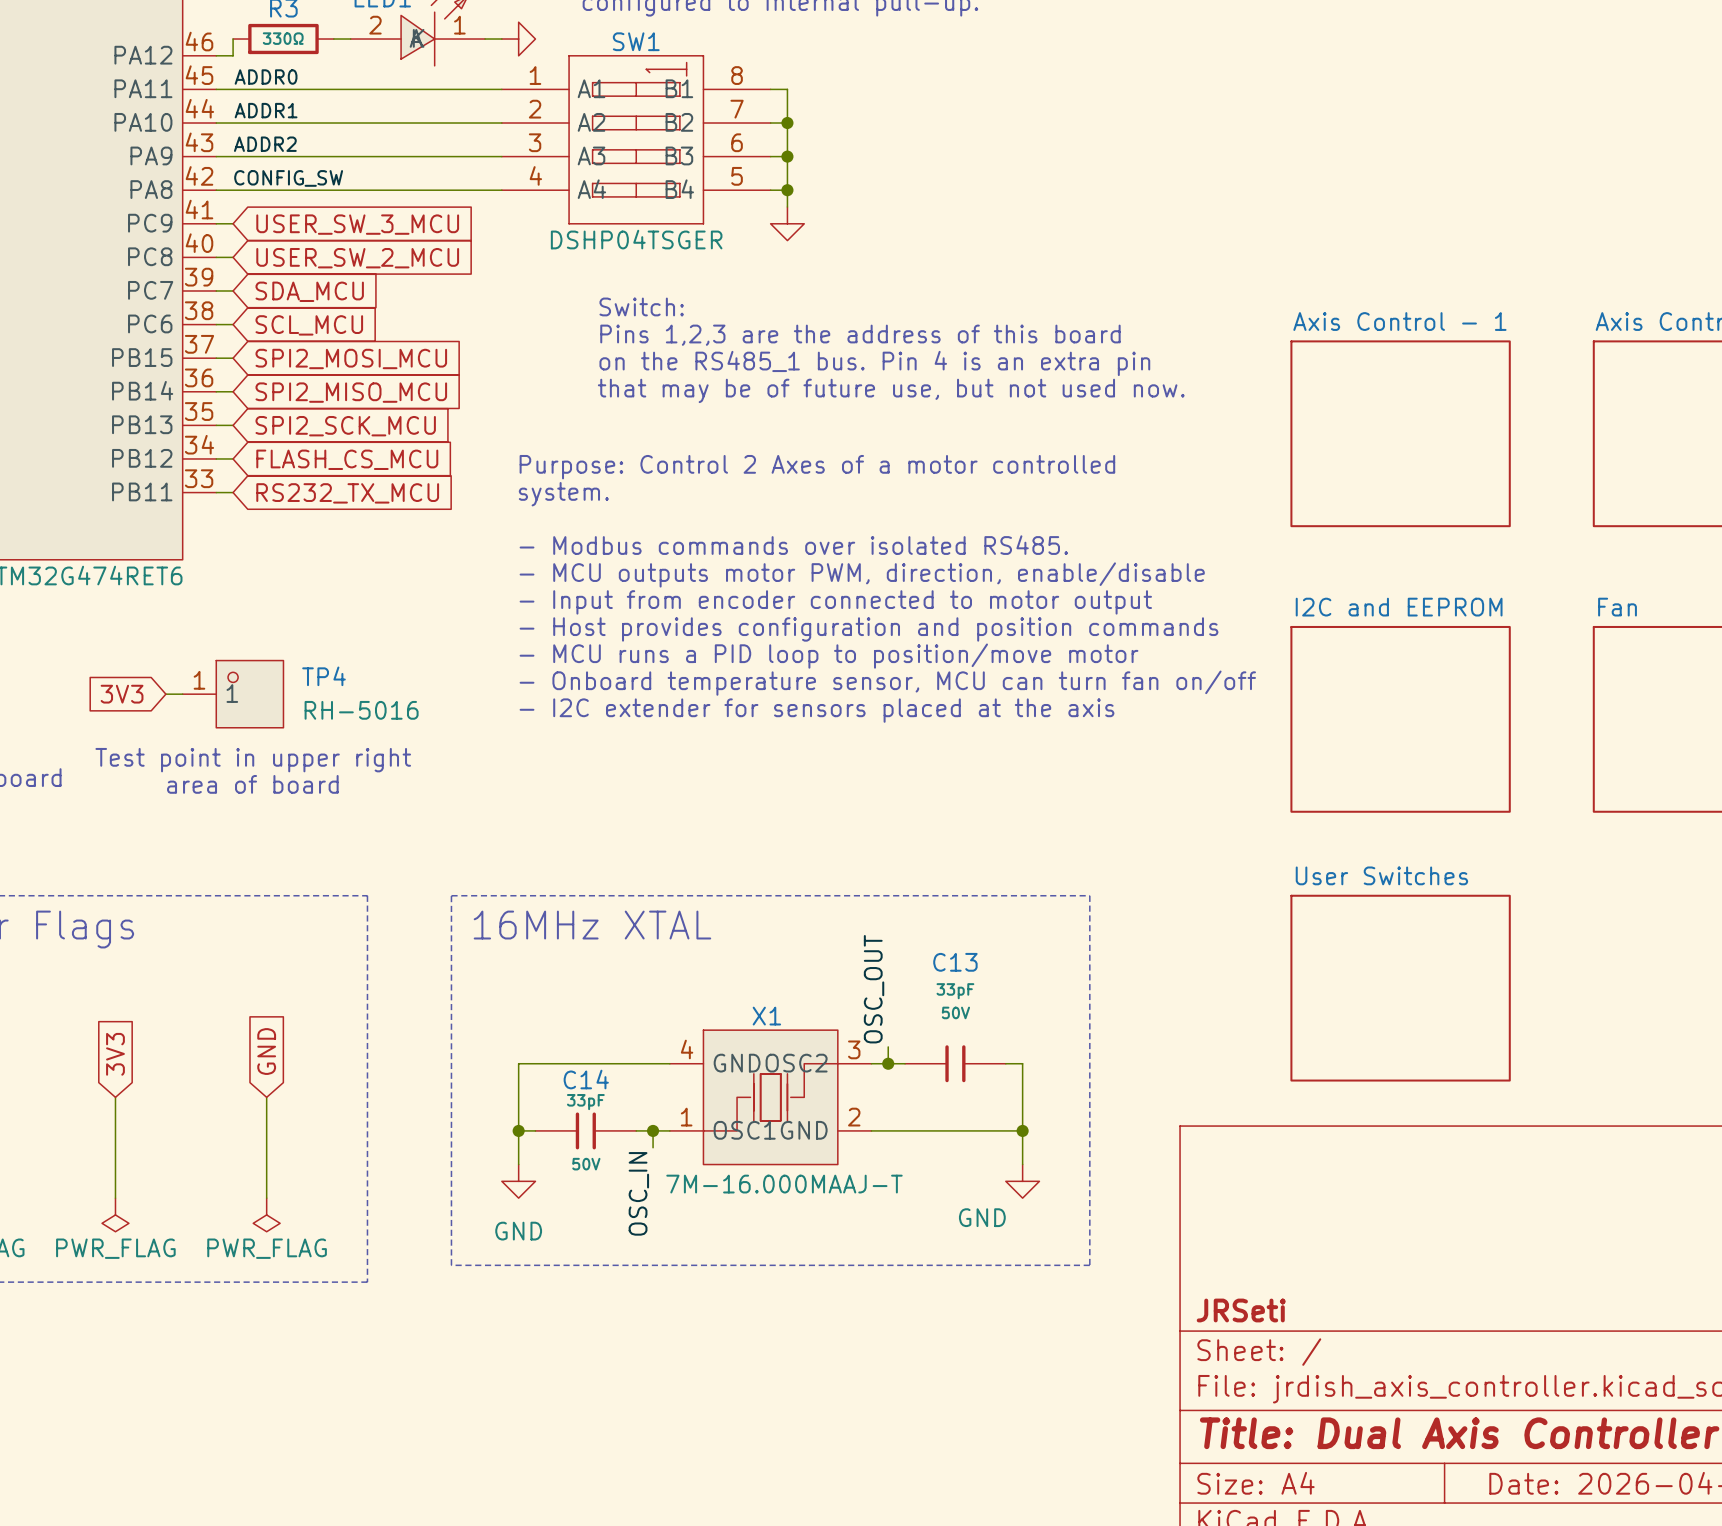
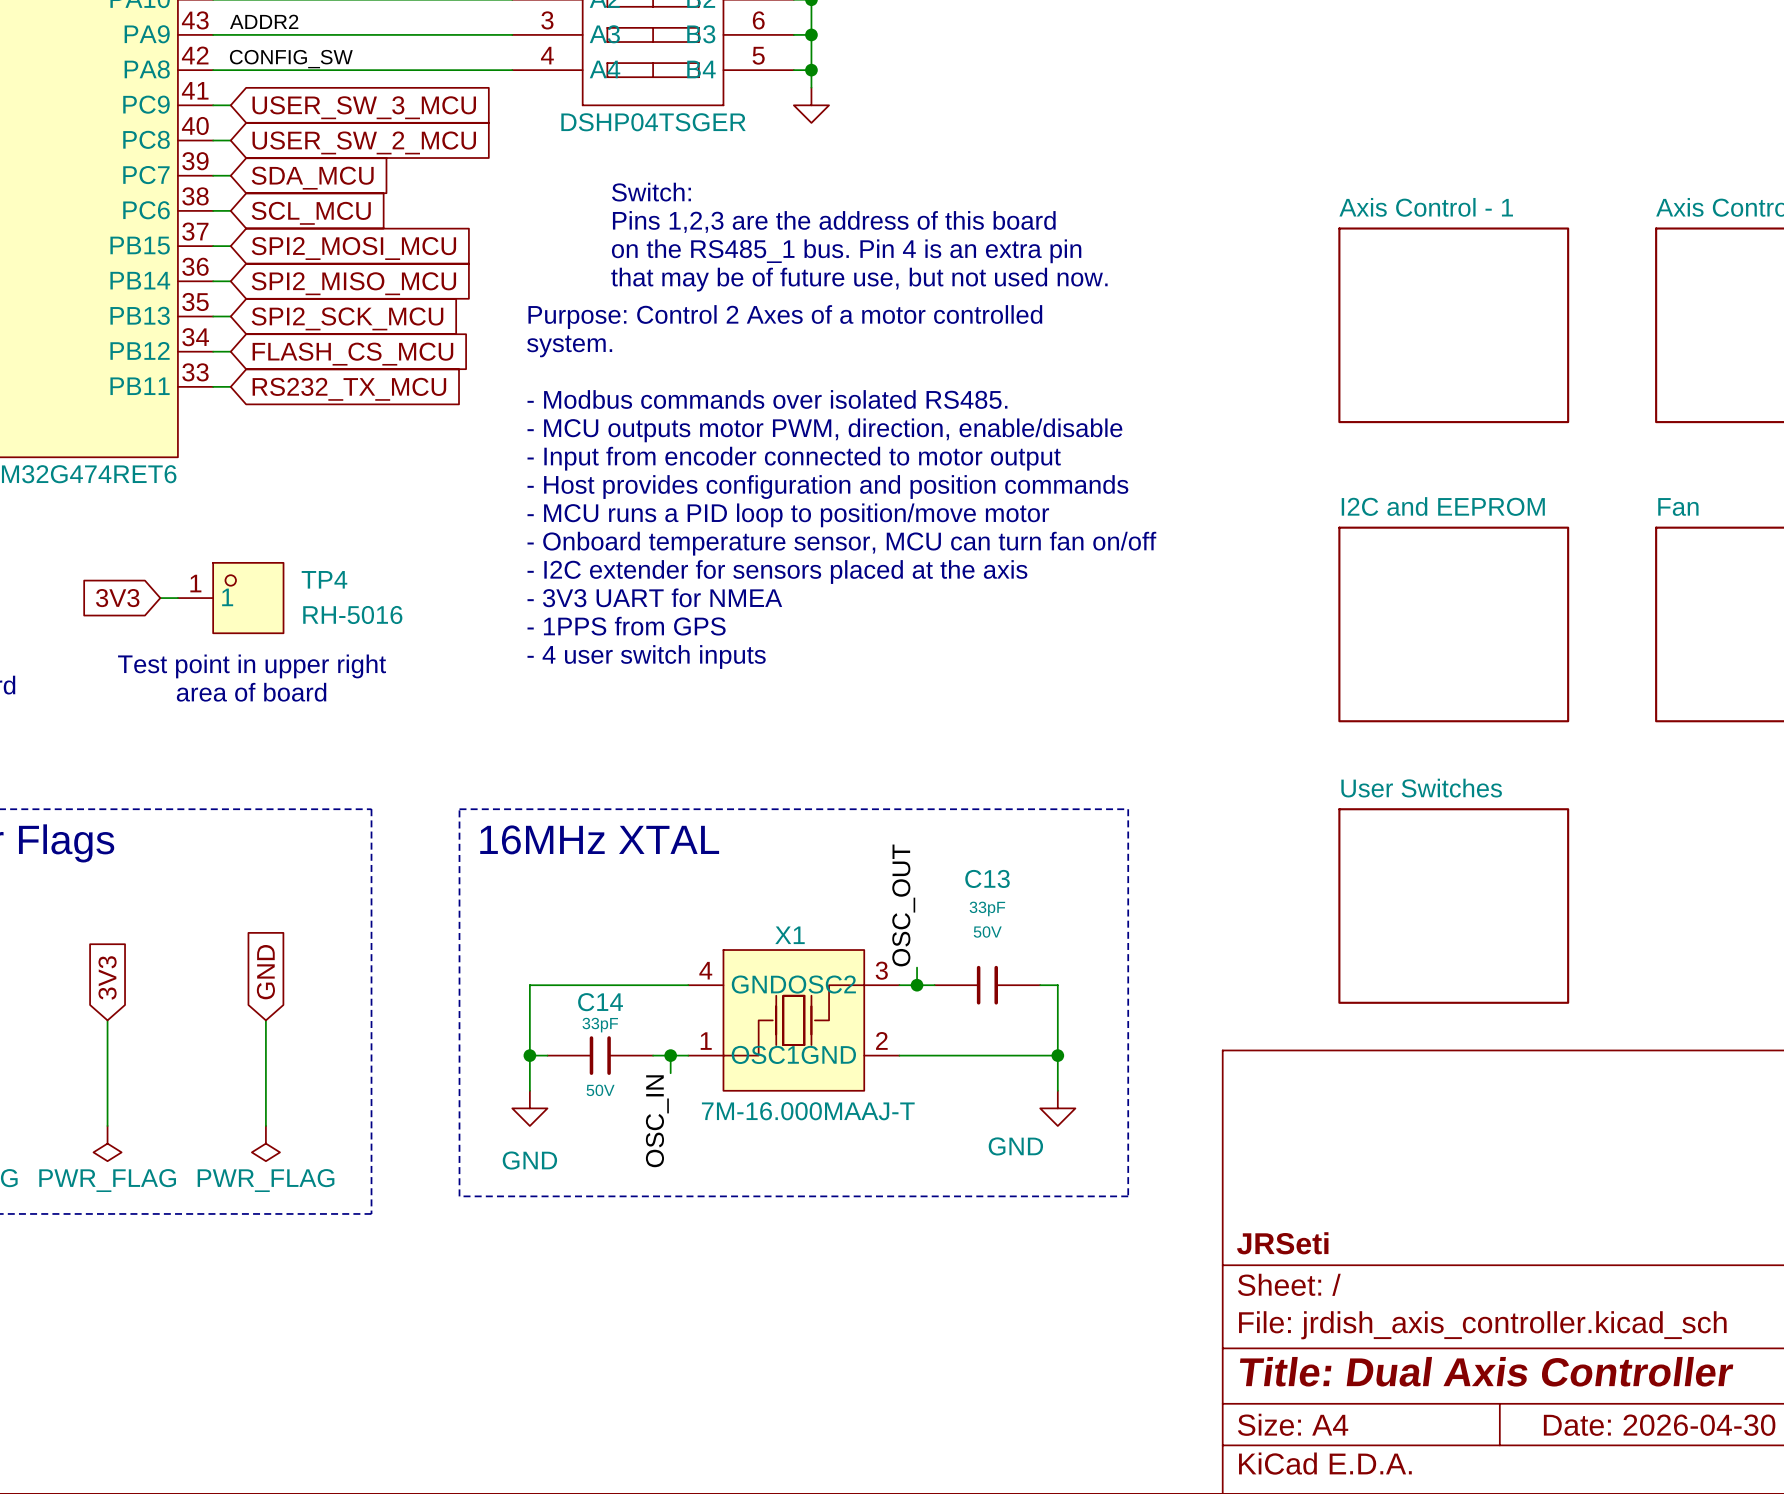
text position: Purpose: Control 2 Axes of a motor controlled (817, 467) -> Purpose: Control 2 Axes of a motor controlled (785, 317)
text position: system. (563, 494) -> system. (569, 346)
text position: - Modbus commands over isolated RS485. (793, 545) -> - Modbus commands over isolated RS485. (767, 399)
text position: - MCU outputs motor PWM, direction, enable/disable (862, 574) -> - MCU outputs motor PWM, direction, enable/disable (824, 430)
text position: - Input from encoder connected to motor output (835, 602) -> - Input from encoder connected to motor output (794, 458)
text position: - Host provides configuration and position commands (869, 629) -> - Host provides configuration and position commands (827, 487)
text position: - MCU runs a PID loop to position/move motor (829, 656) -> - MCU runs a PID loop to position/move motor (788, 515)
text position: - Onboard temperature sensor, MCU can turn fan on/off (887, 683) -> - Onboard temperature sensor, MCU can turn fan on/off (841, 543)
text: none -> - 3V3 UART for NMEA (654, 597)
text position: - I2C extender for sensors placed at the axis (817, 710) -> - I2C extender for sensors placed at the axis (777, 572)
text: none -> - 1PPS from GPS (626, 626)
text: none -> - 4 user switch inputs (646, 657)

